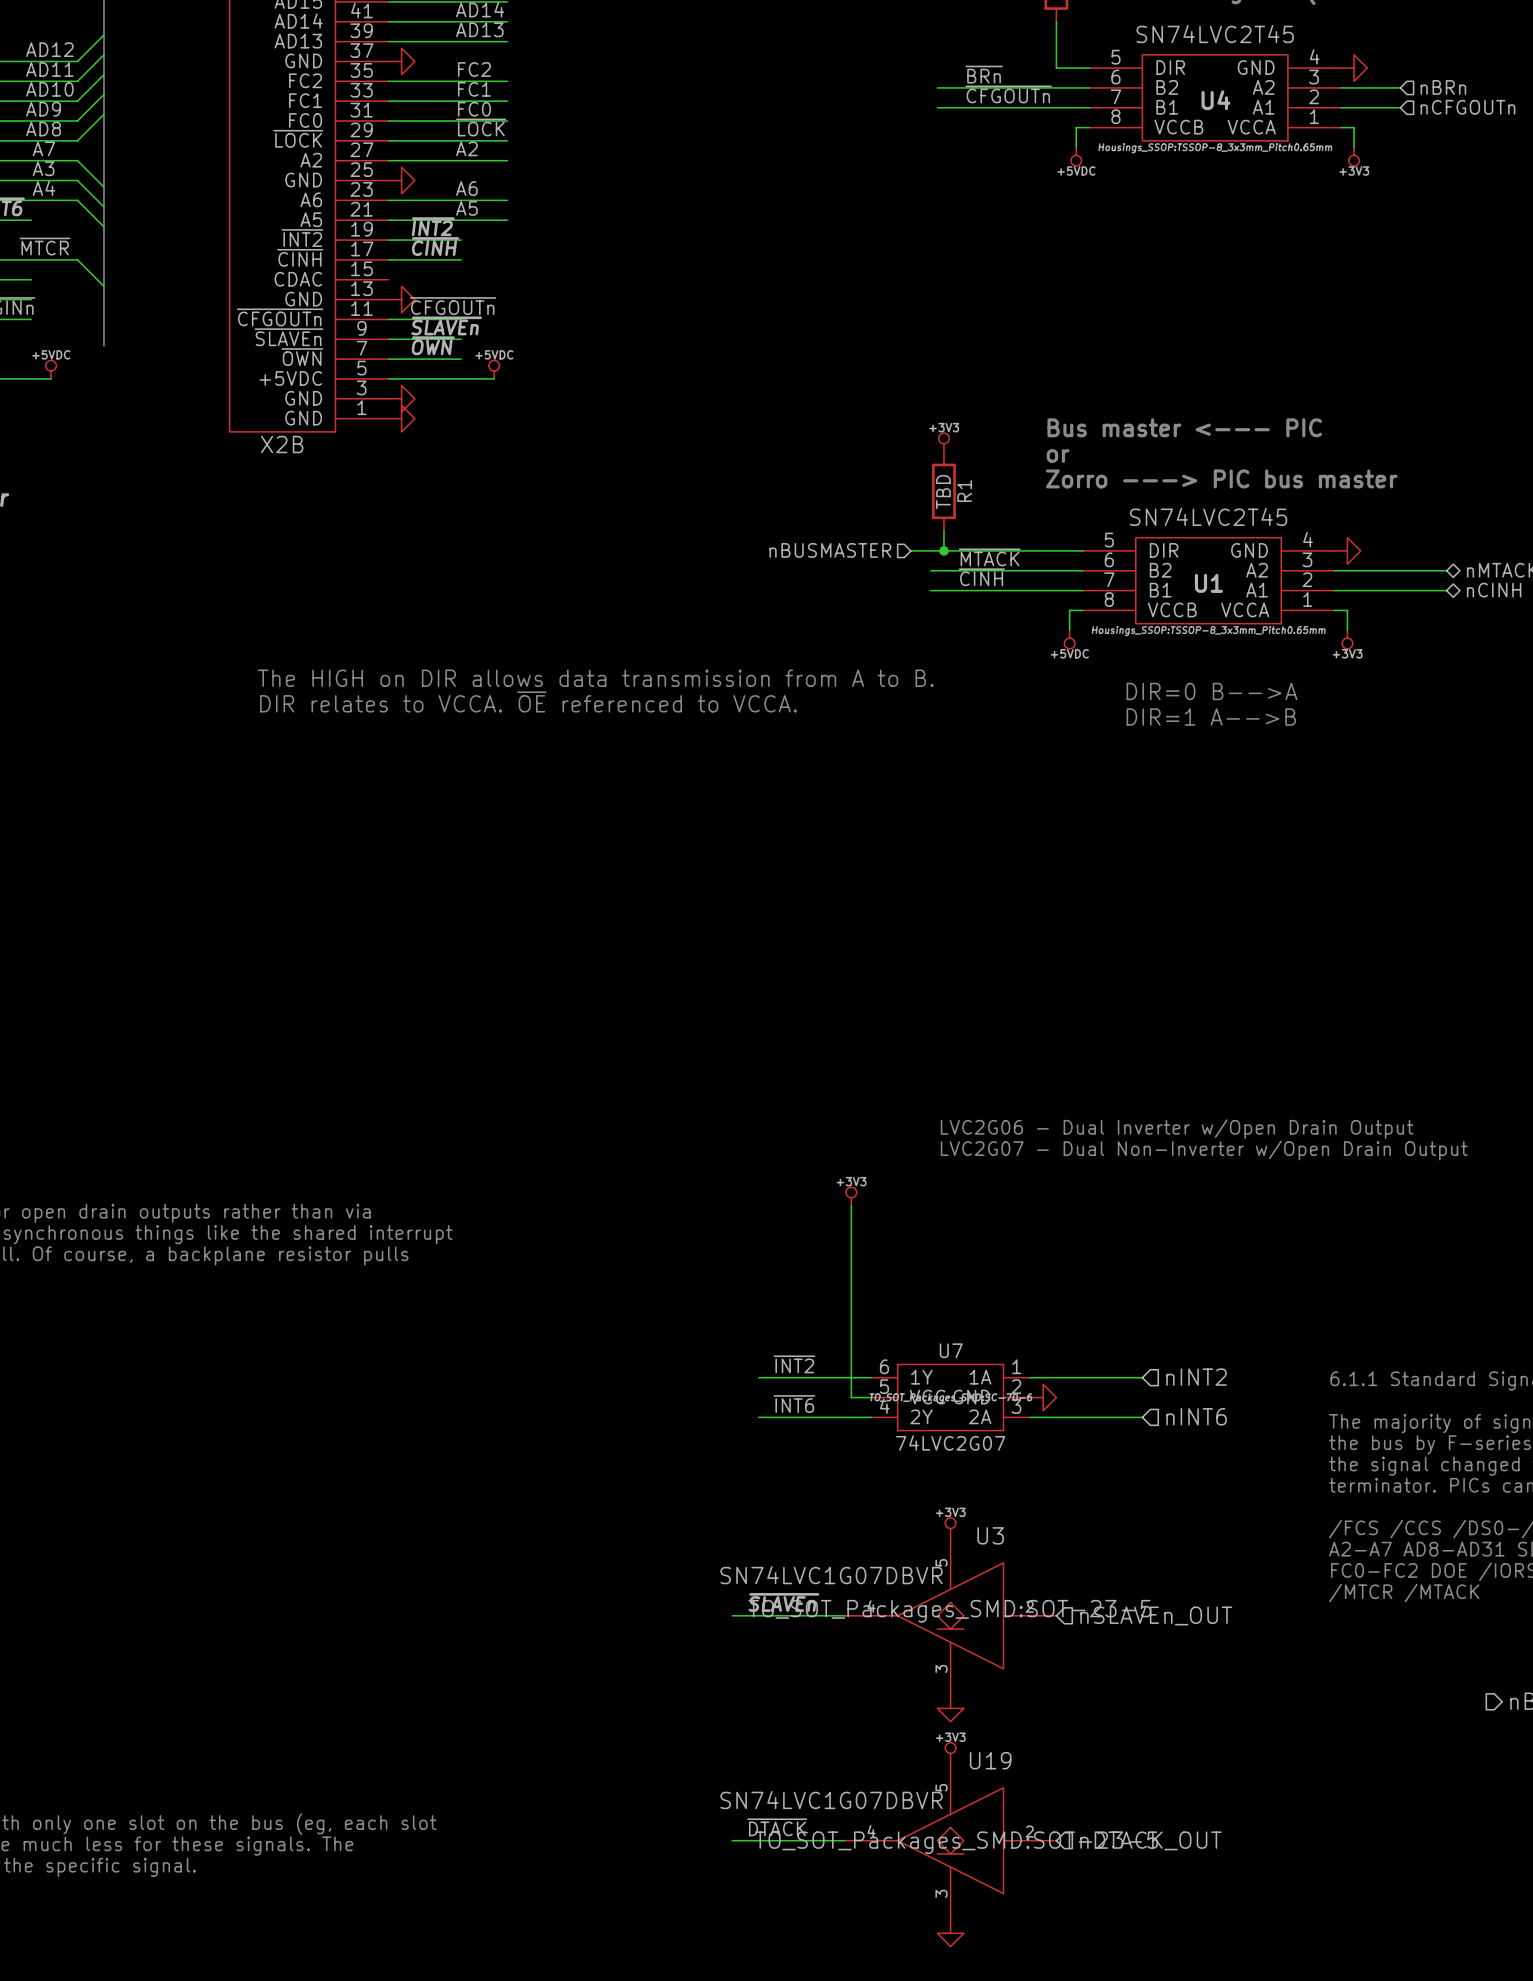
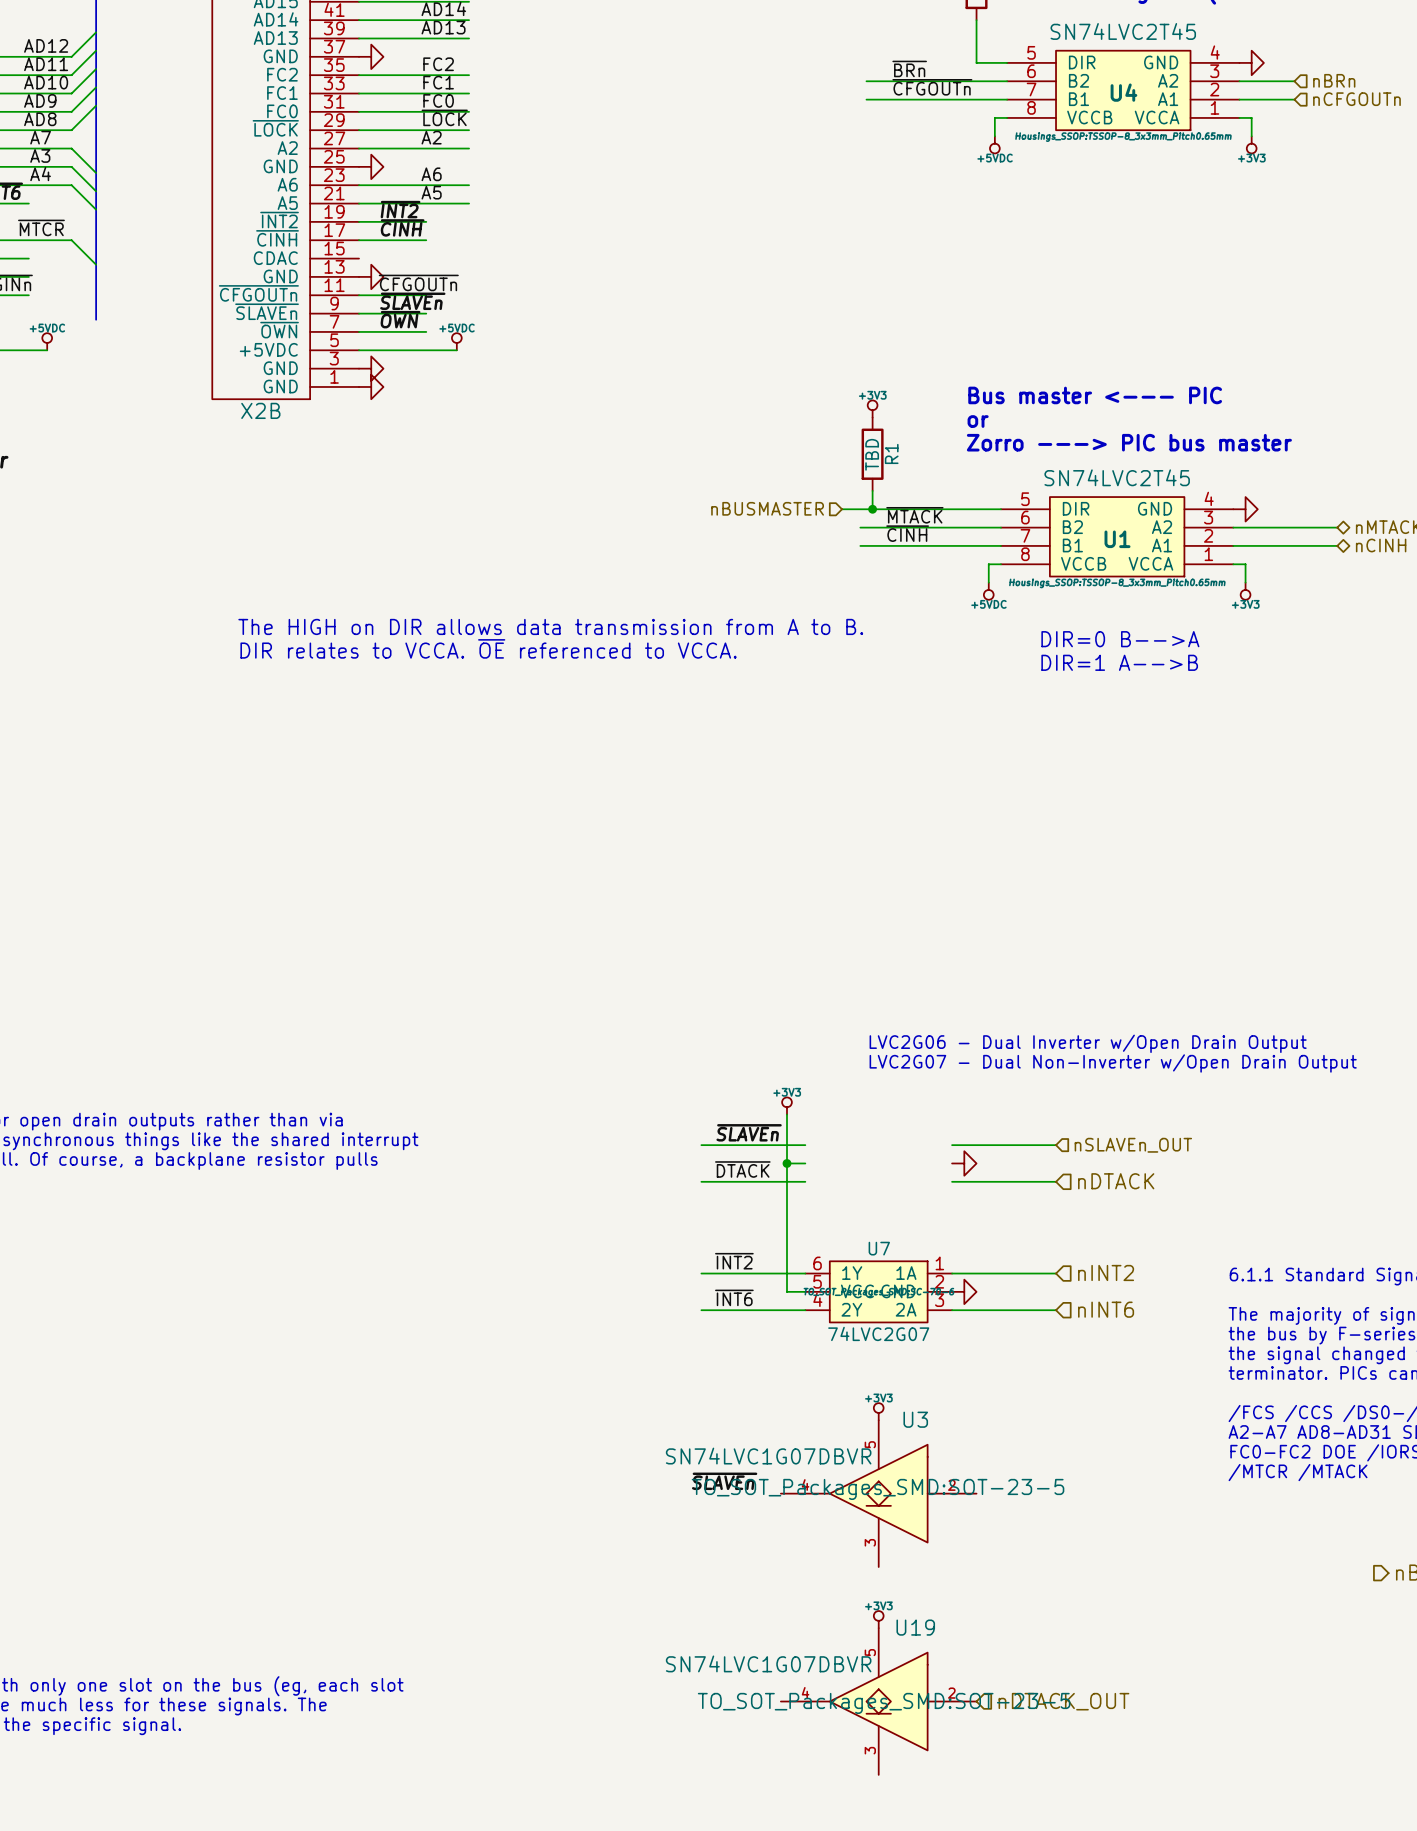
label: none -> ~{SLAVEn} (749, 1132)
wire: none -> (701, 1145) (805, 1145)
wire: none -> (952, 1145) (1056, 1145)
hierarchical label: none -> nSLAVEn_OUT (1133, 1145)
wire: none -> (787, 1163) (805, 1163)
junction: none -> (787, 1163)
power symbol: none -> (964, 1163)
label: none -> ~{DTACK} (742, 1169)
hierarchical label: none -> nDTACK (1116, 1181)
wire: none -> (701, 1181) (805, 1181)
wire: none -> (952, 1181) (1056, 1181)
wire: (732, 1615) (844, 1615) -> none
hierarchical label: nSLAVEn_OUT (1156, 1615) -> none
power symbol: (950, 1708) -> none
label: ~{DTACK} (777, 1827) -> none
wire: (732, 1840) (844, 1840) -> none
power symbol: (950, 1933) -> none

